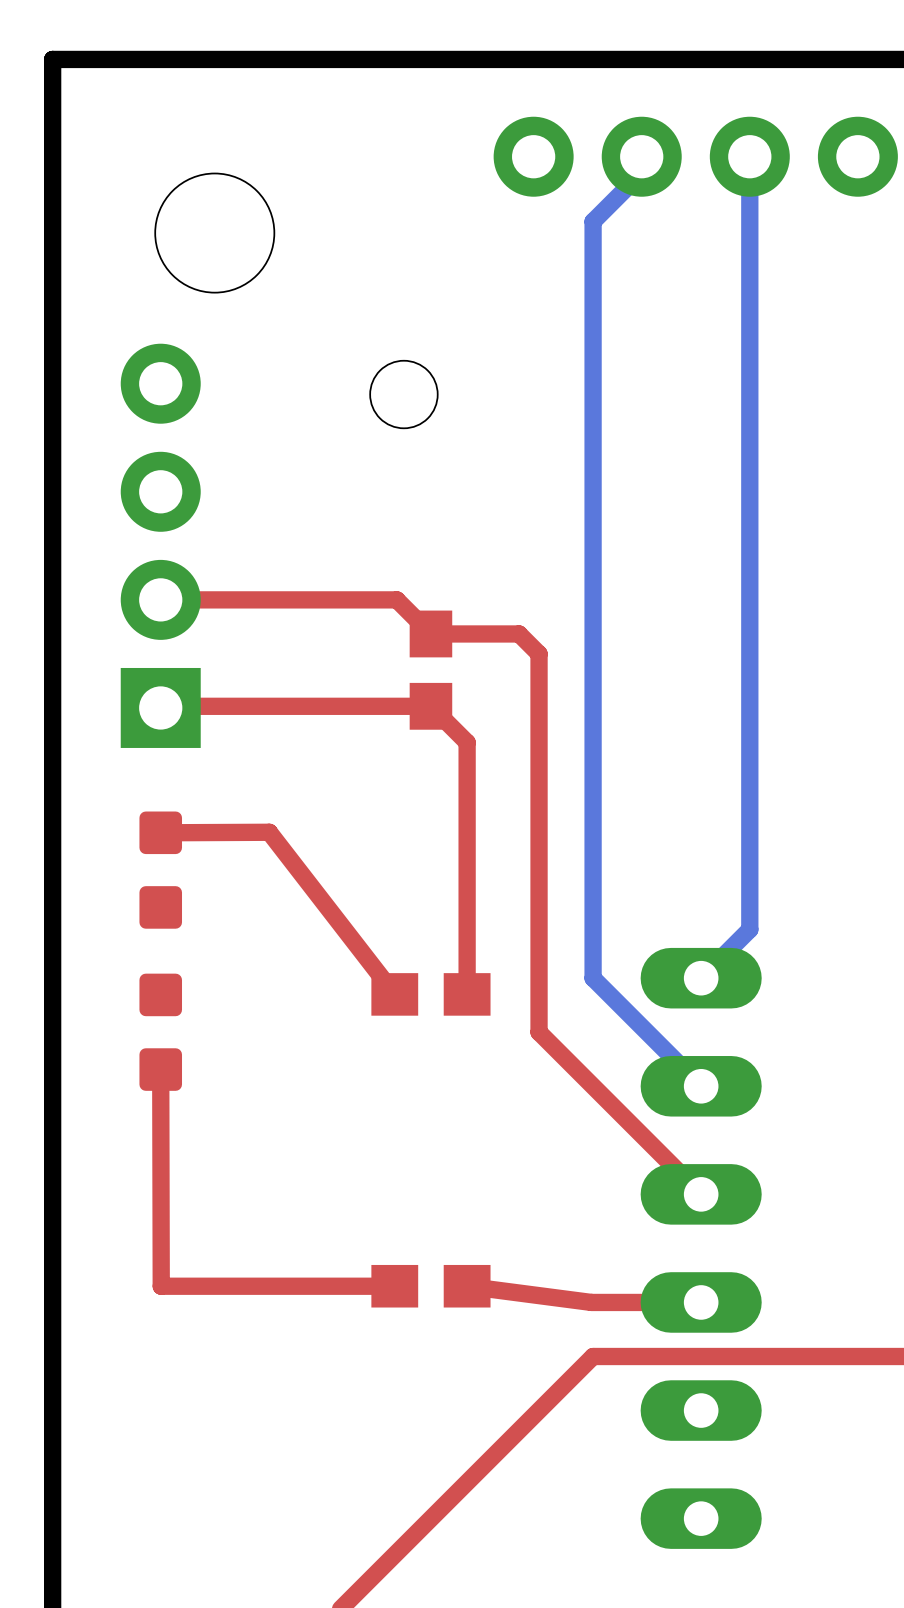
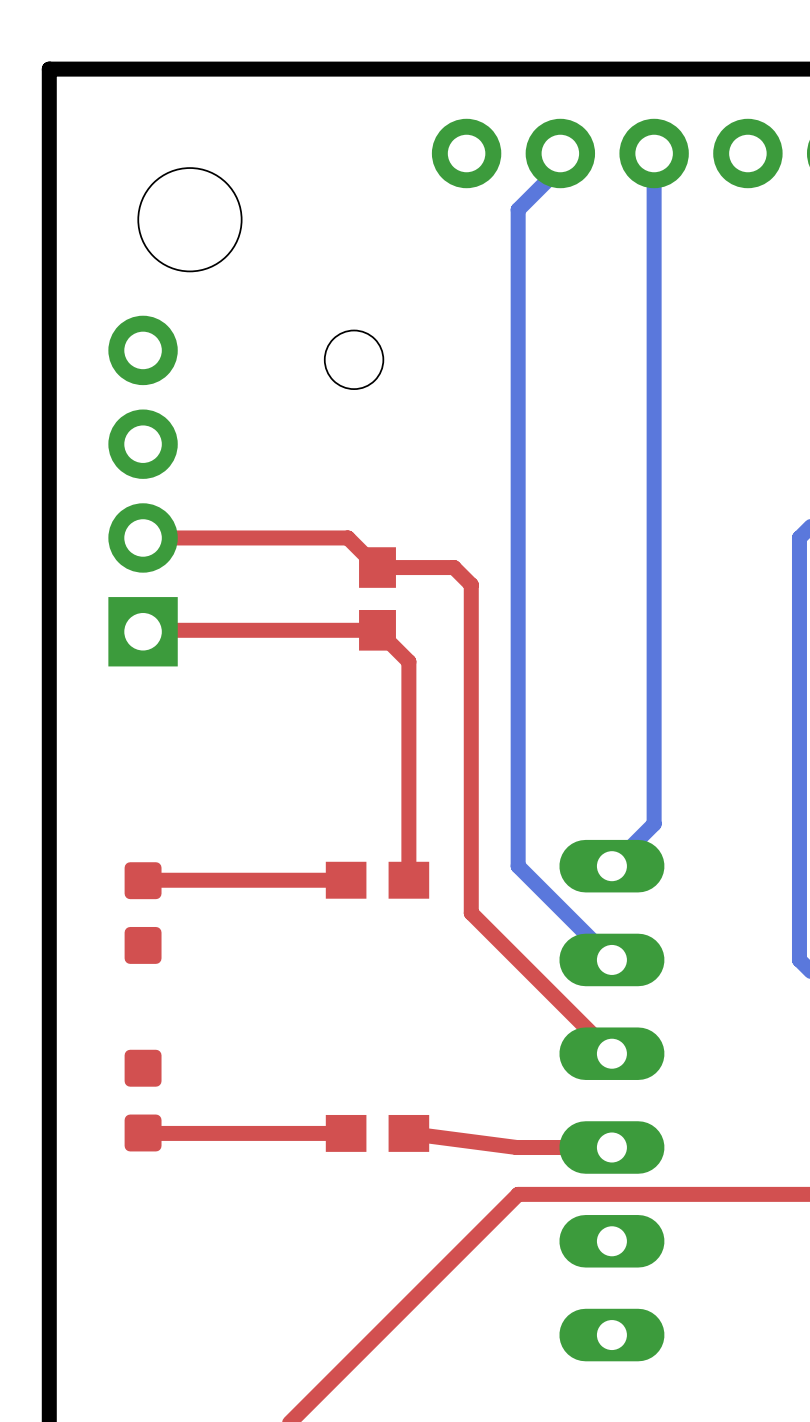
top track: (160, 832) (269, 832) (394, 994) -> (143, 880) (346, 880)
part position: (160, 870) -> (143, 1100)
top track: (160, 1069) (161, 1286) -> none

